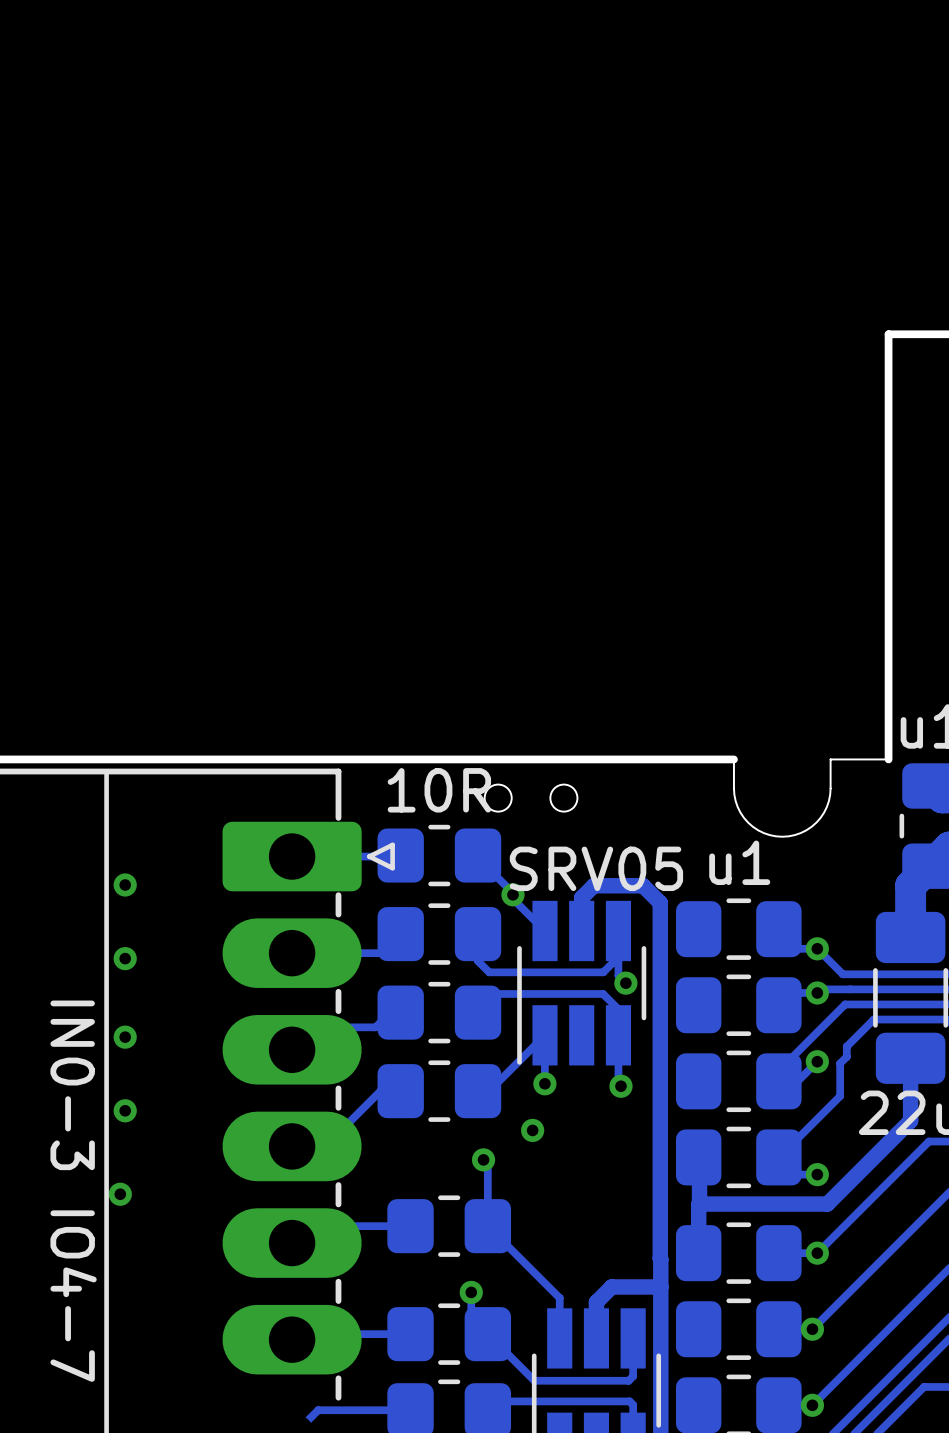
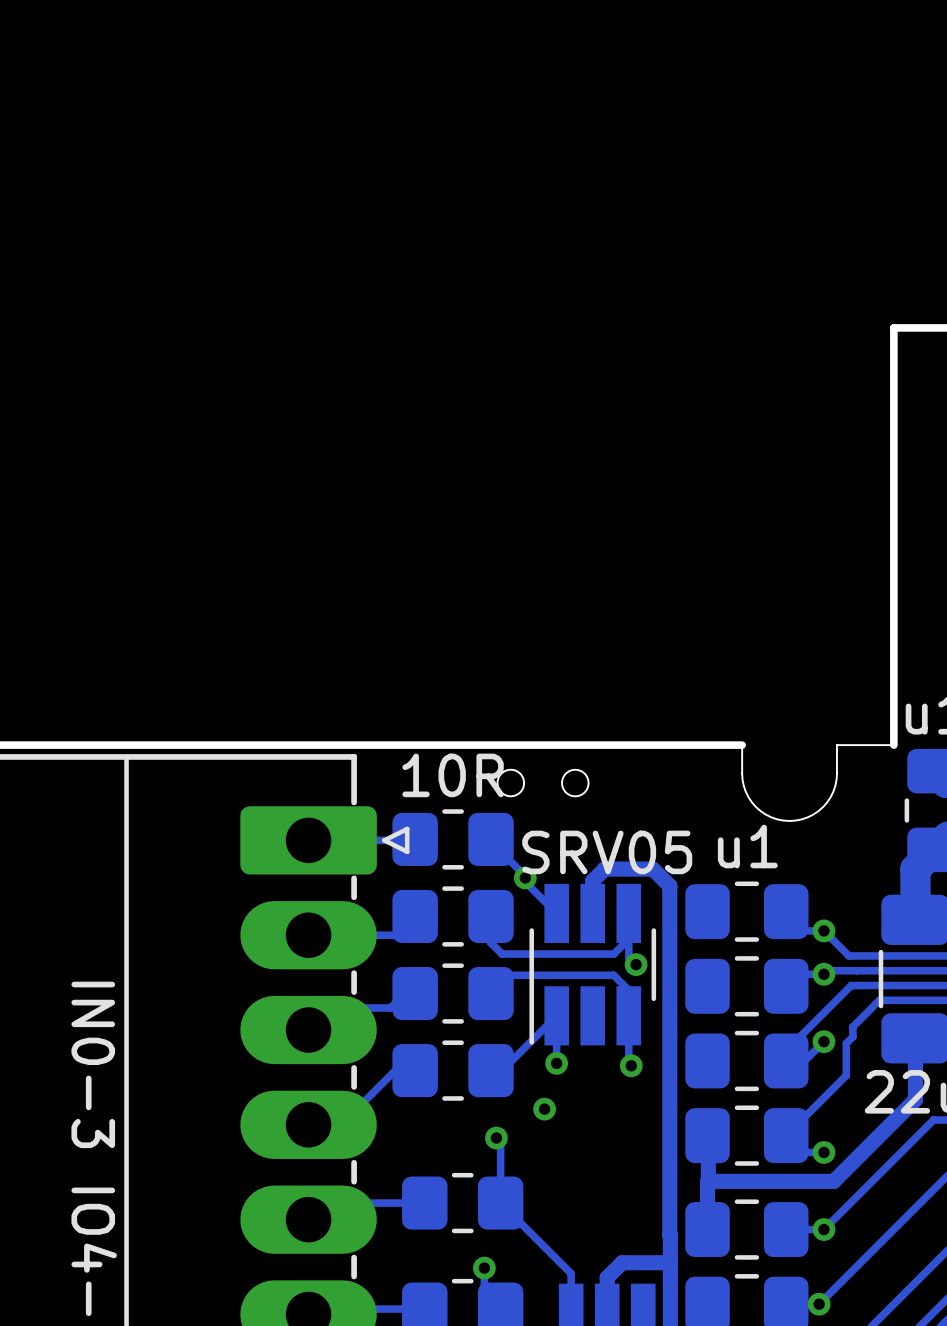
via: (125, 884) -> none
via: (125, 958) -> none
via: (125, 1037) -> none
via: (125, 1110) -> none
via: (120, 1194) -> none

